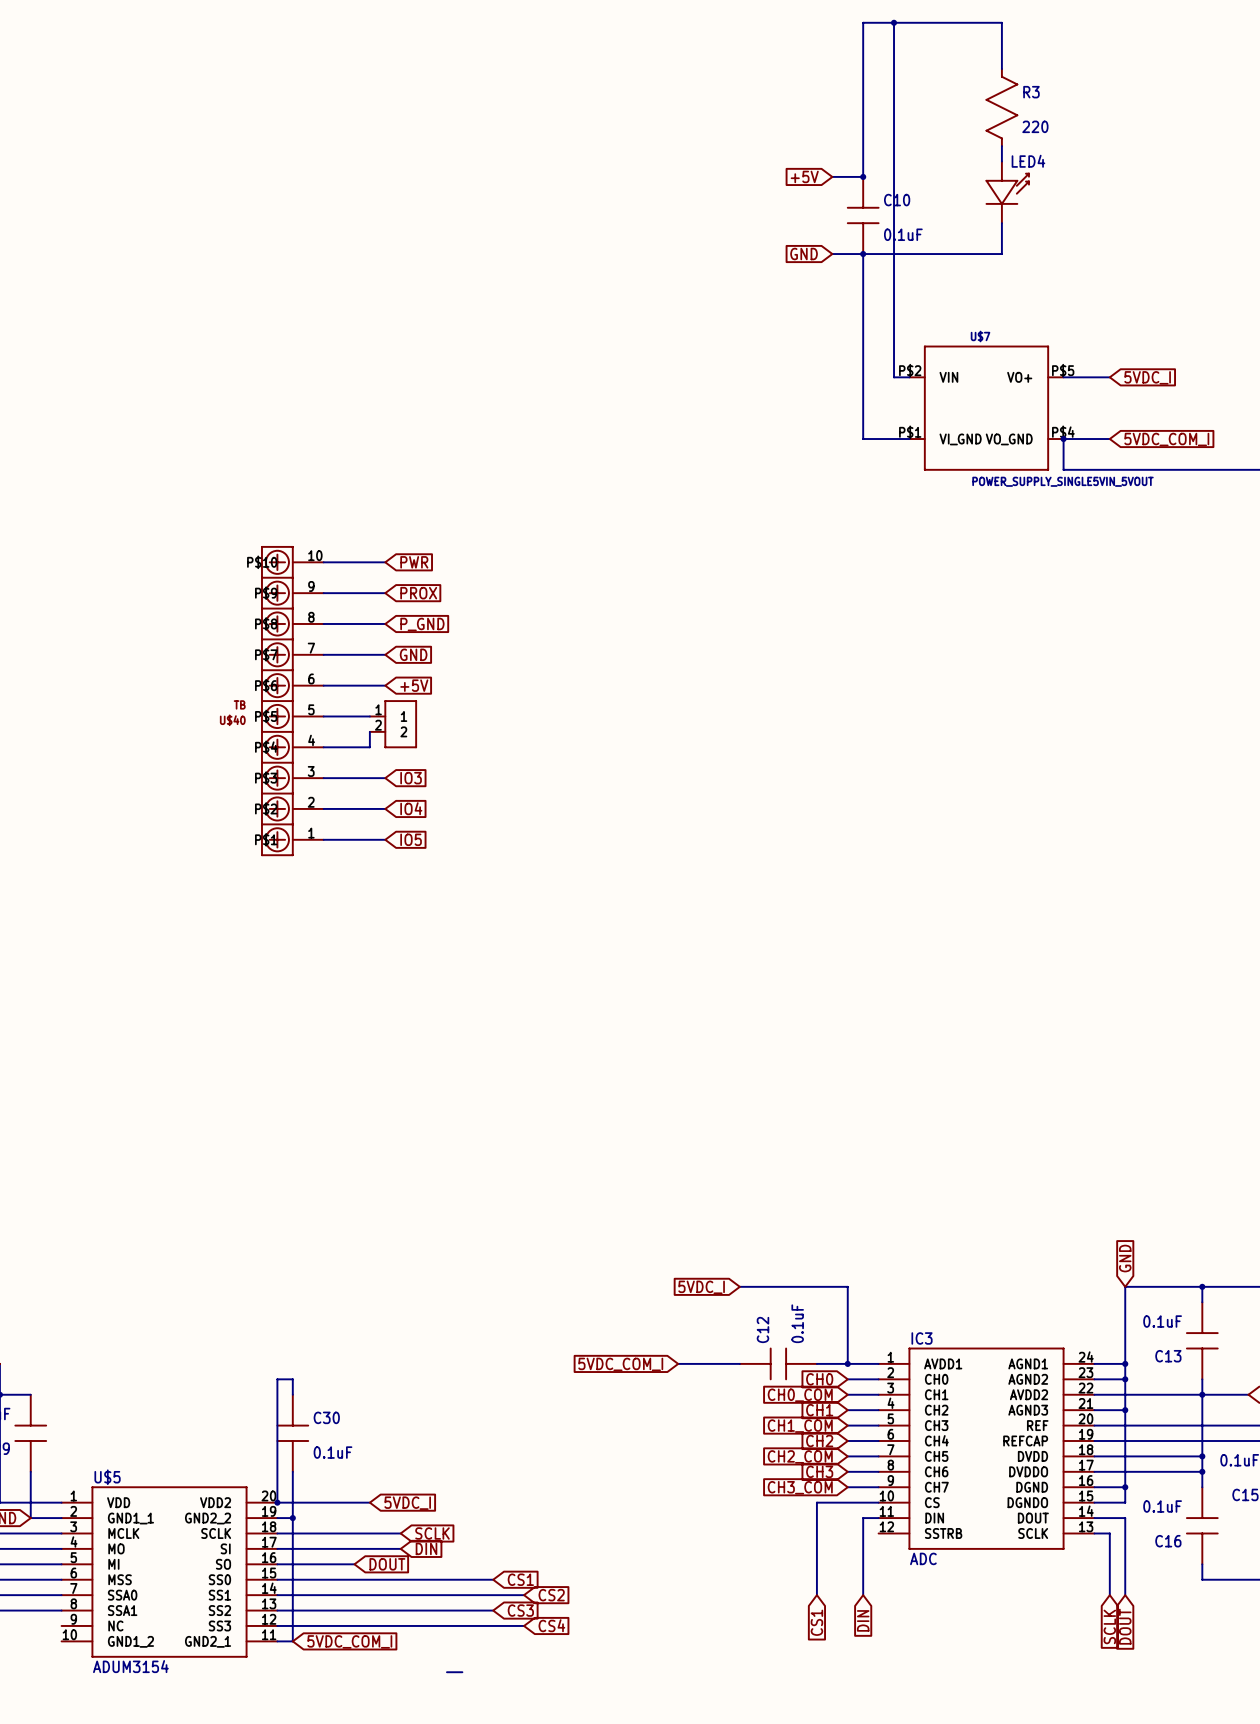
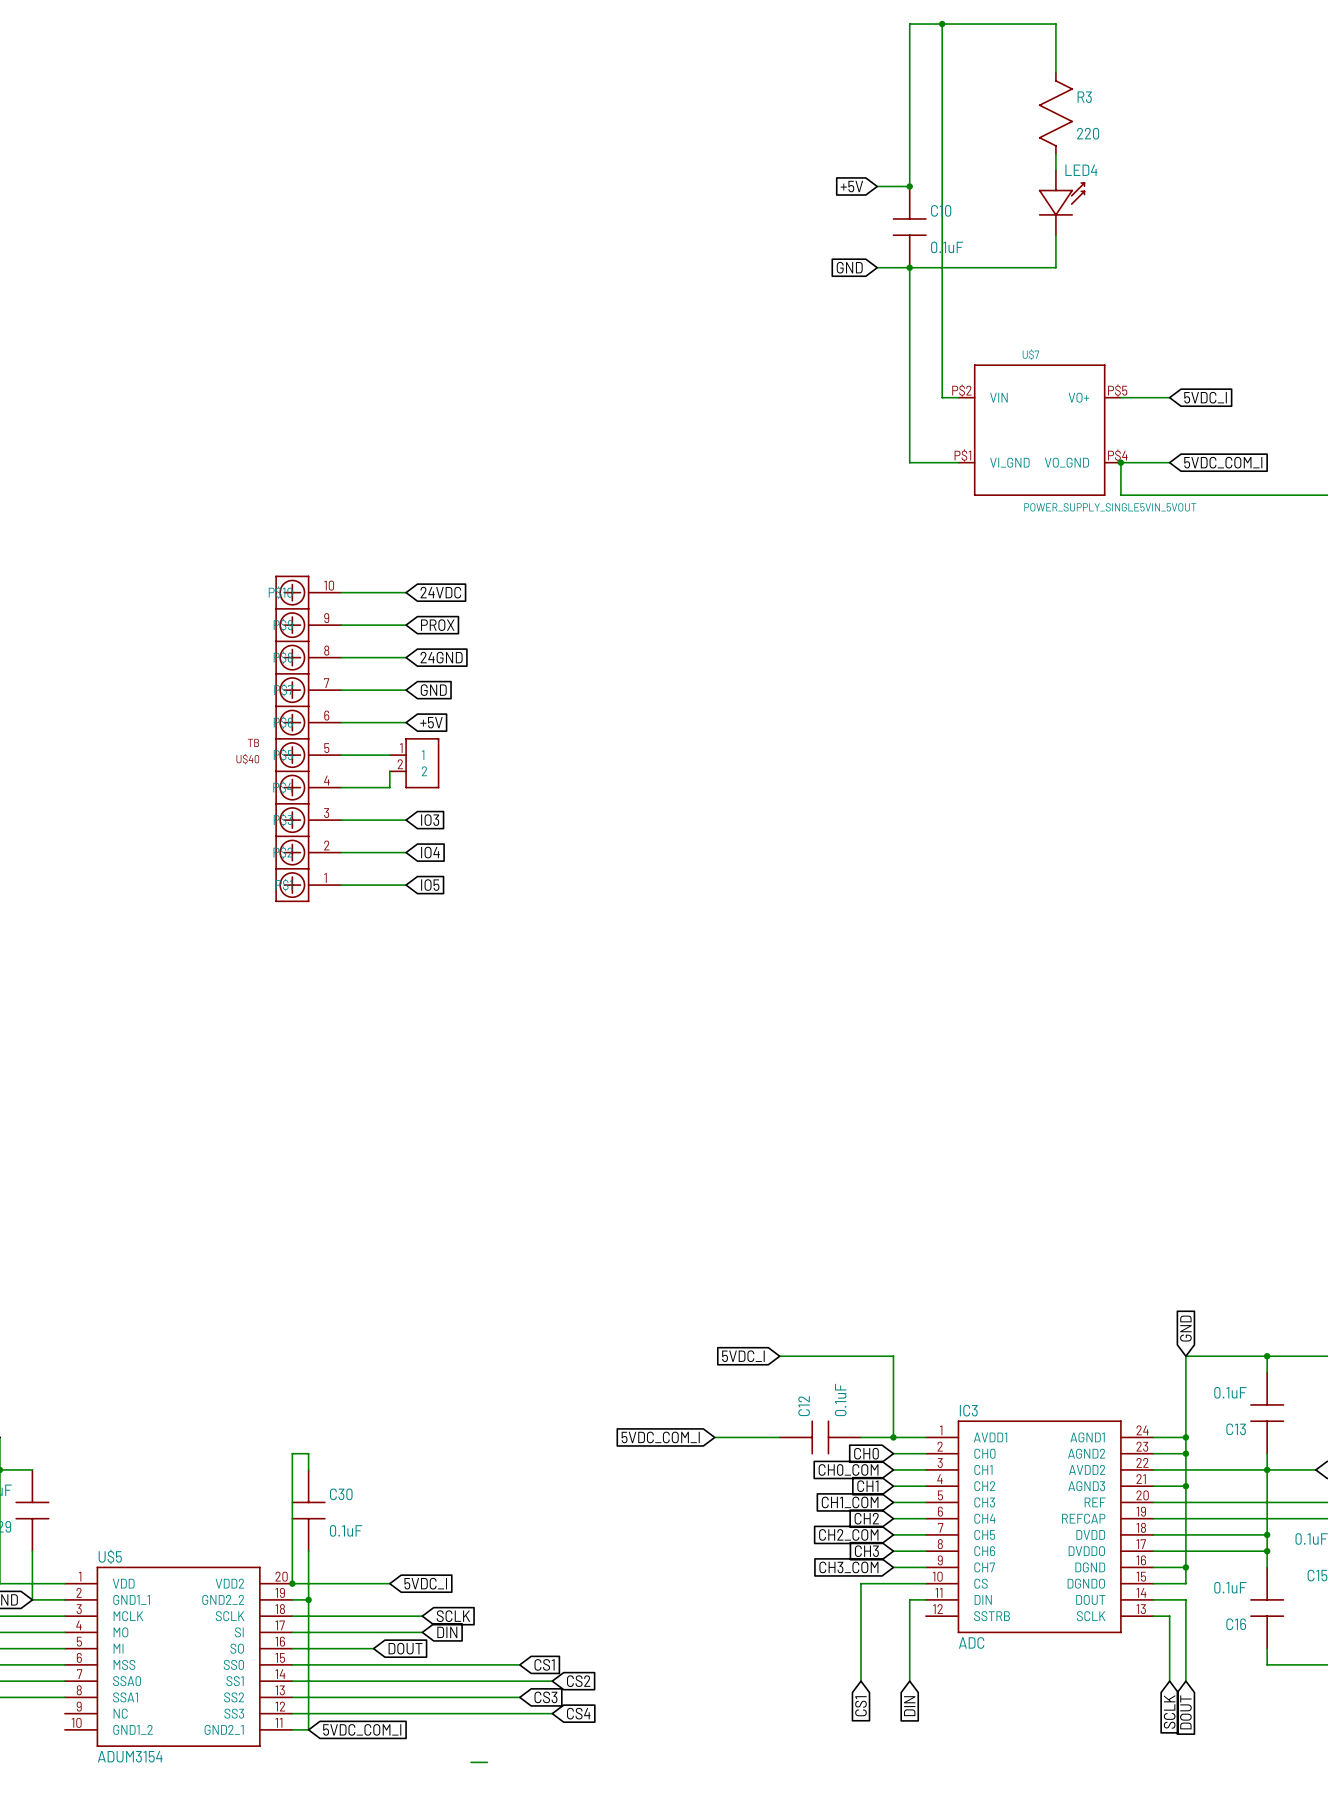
global label: PWR (414, 562) -> 24VDC (440, 592)
global label: P_GND (422, 624) -> 24GND (441, 657)

